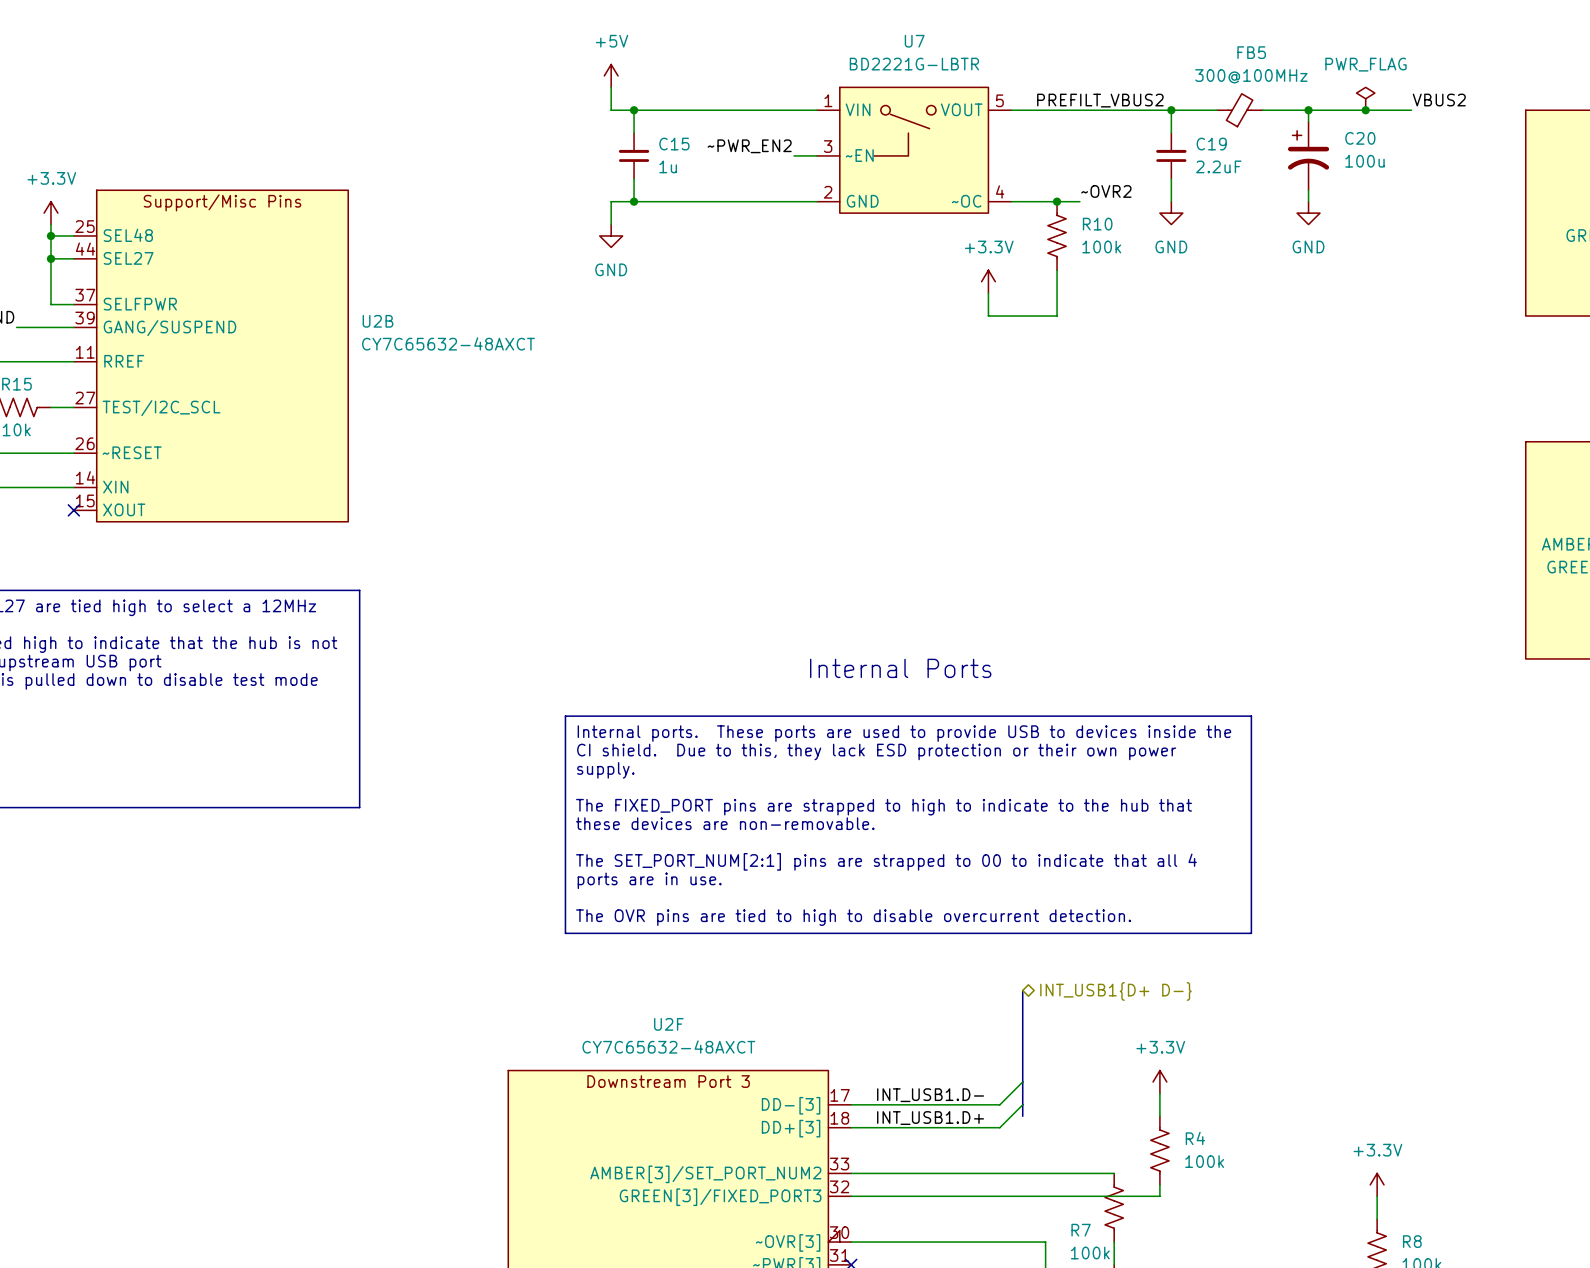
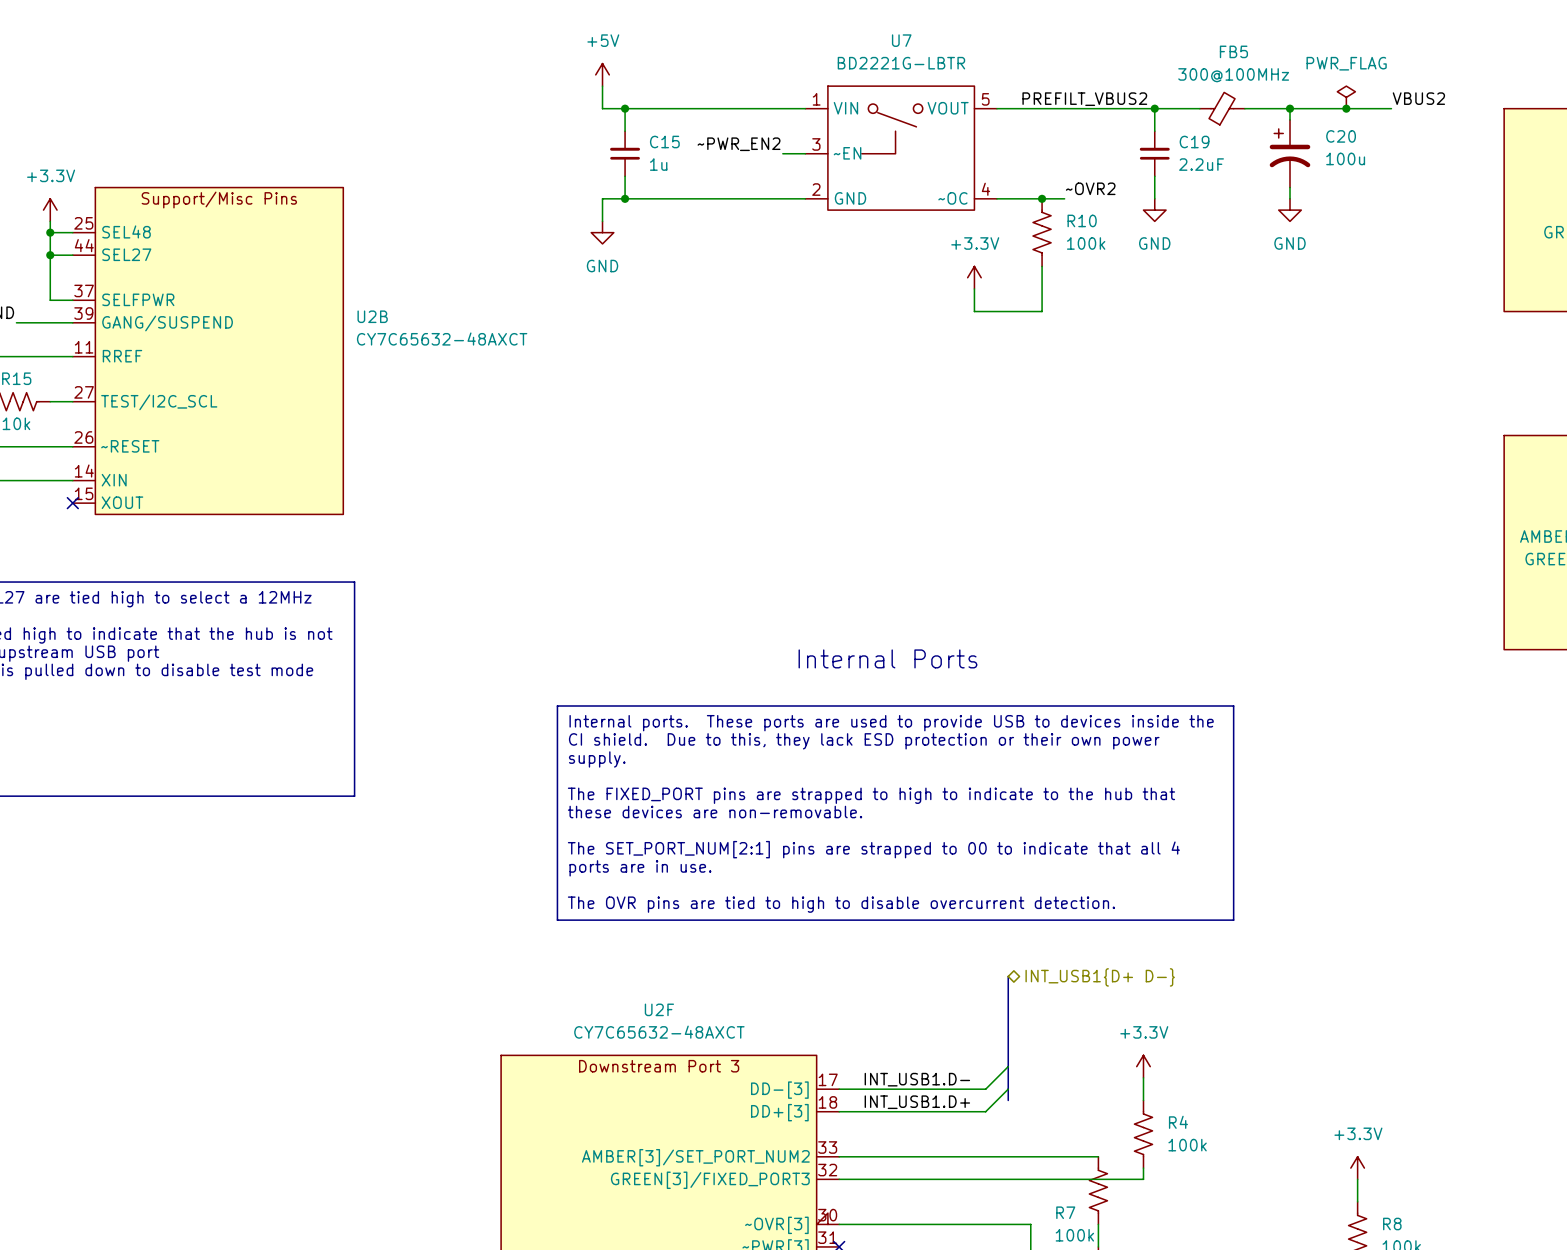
U7 symbol: [816, 87, 1012, 214] -> [805, 86, 997, 211]

